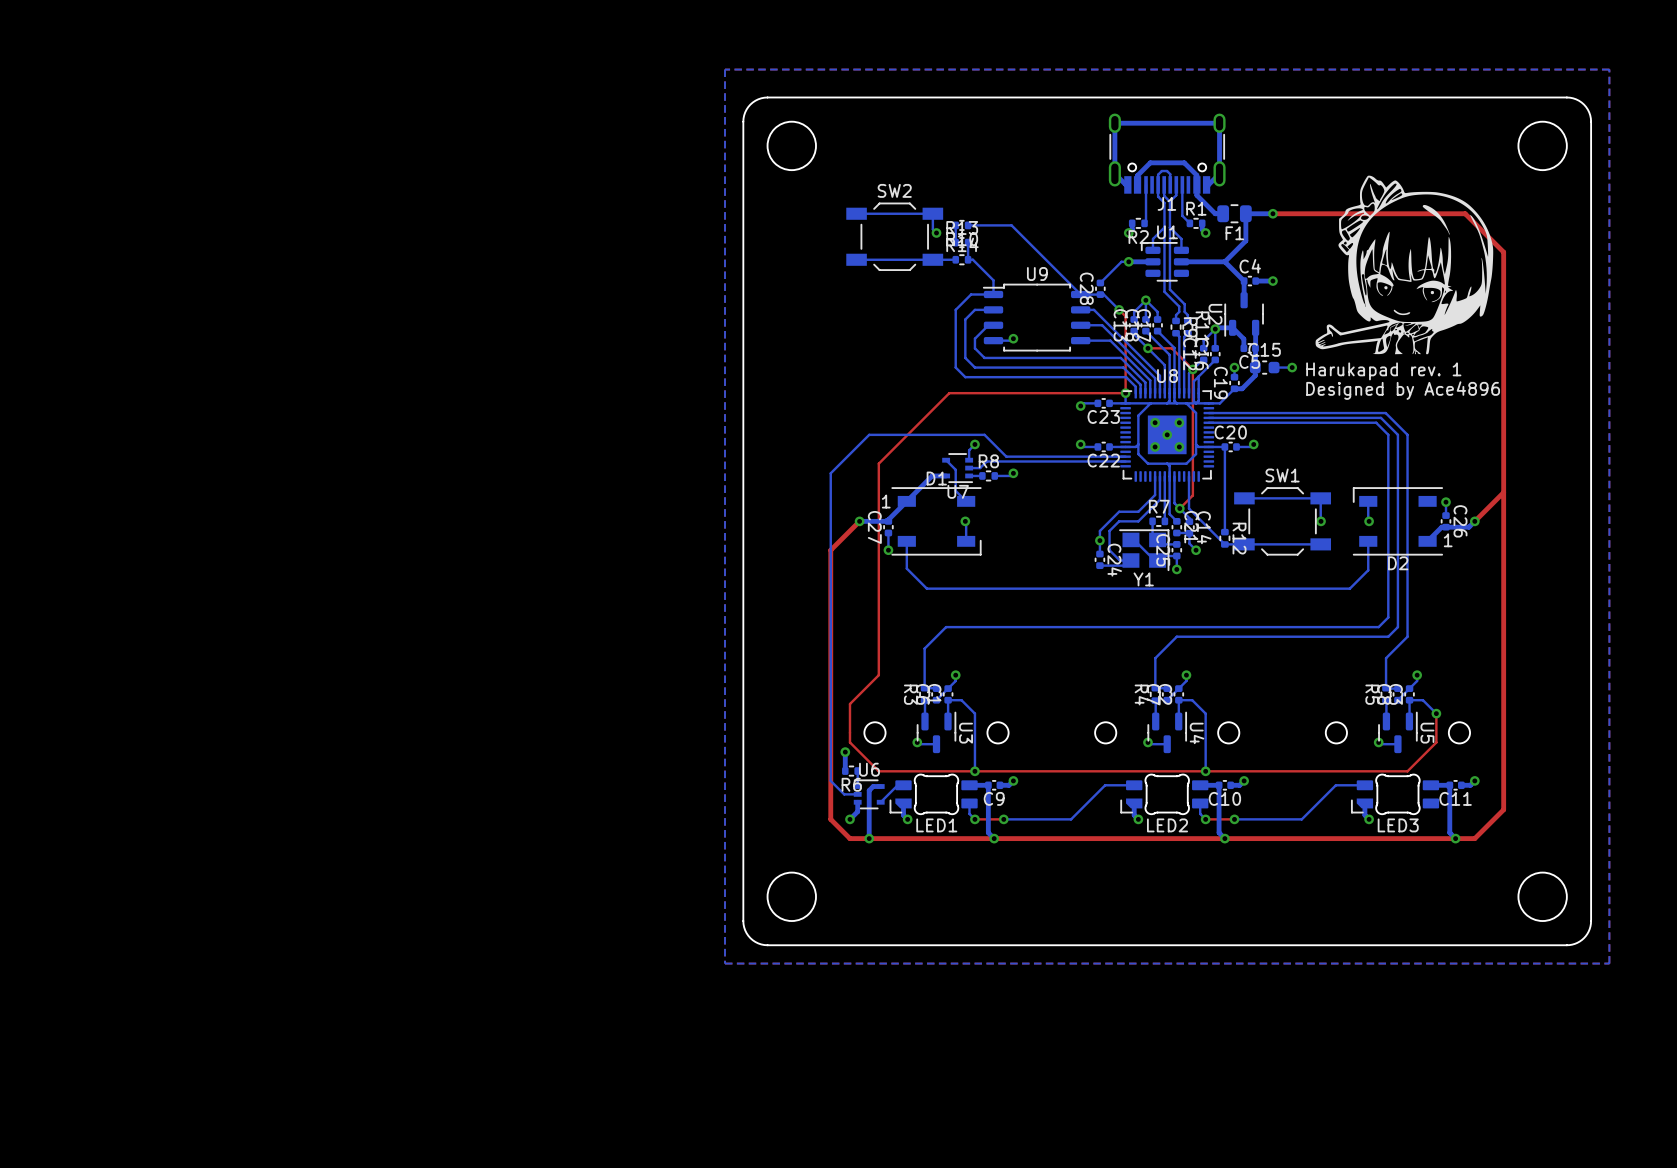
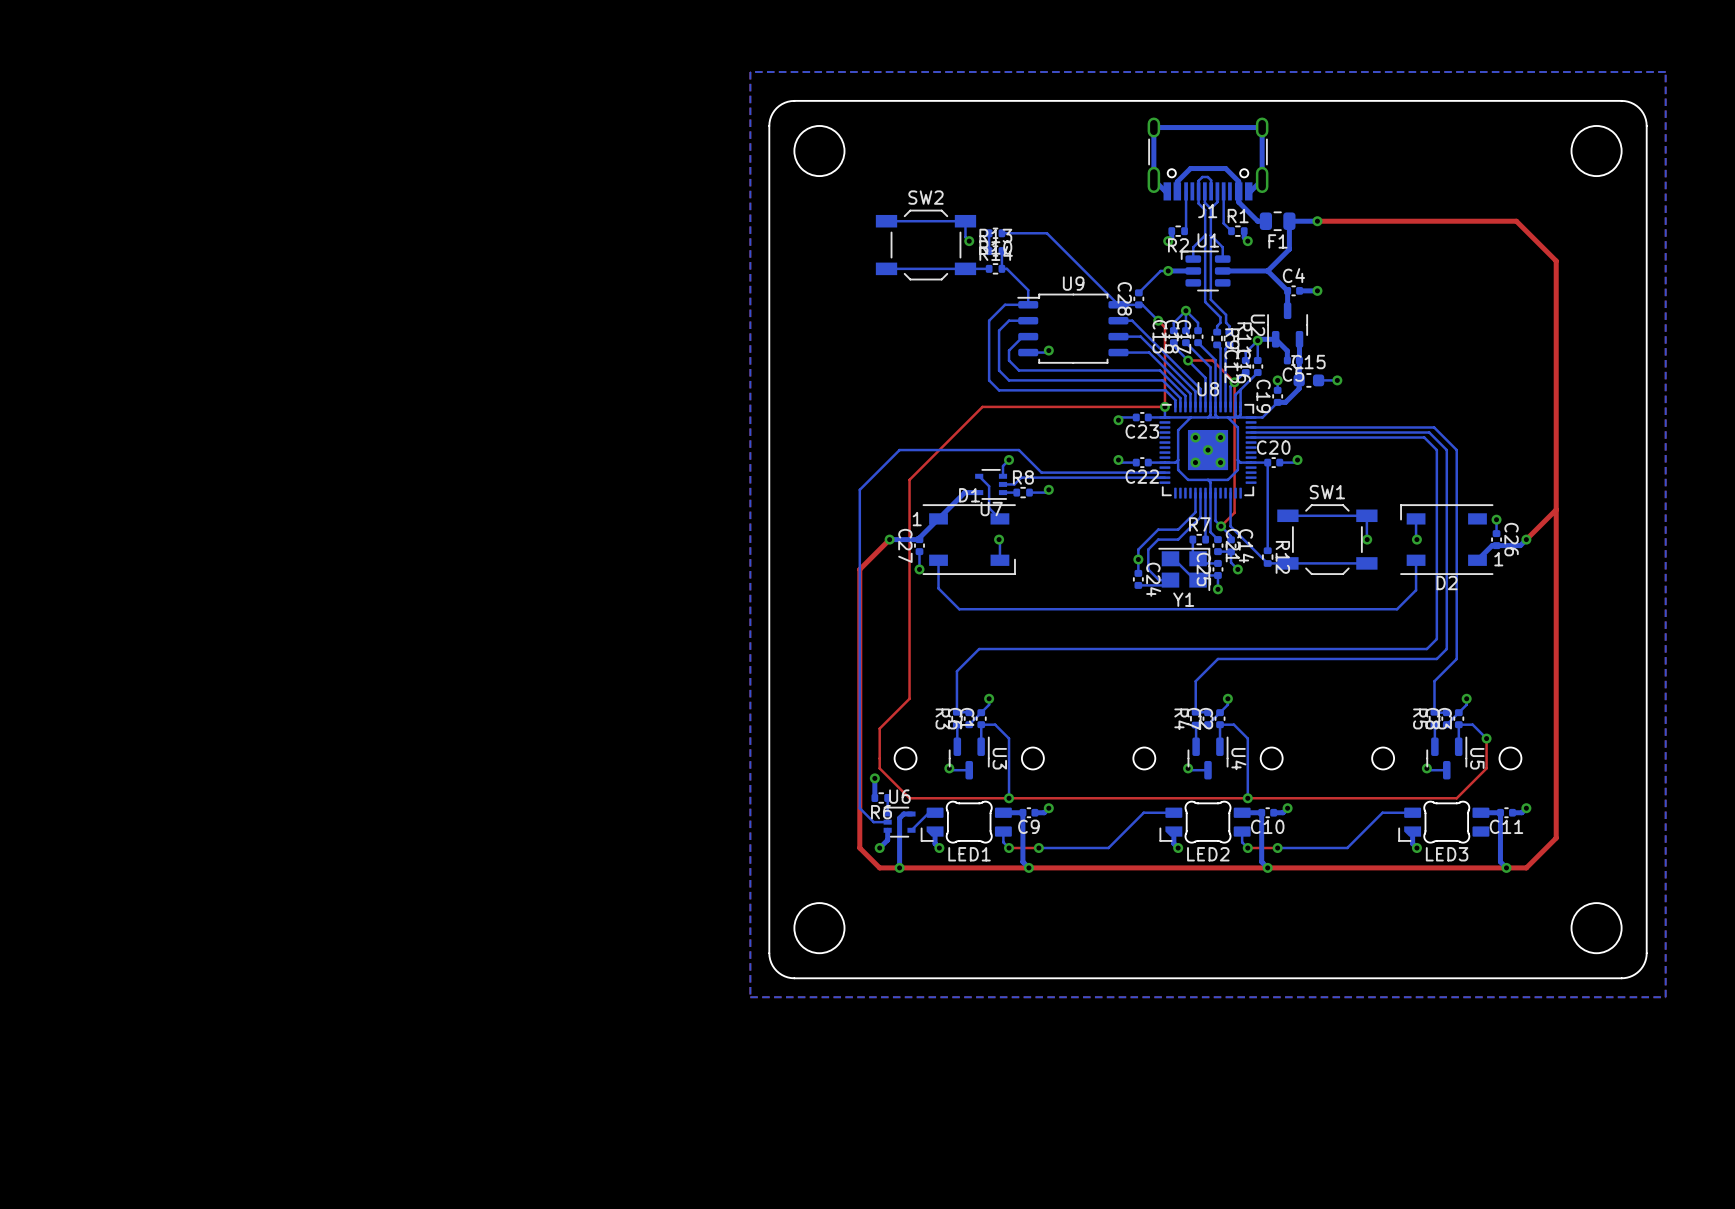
drawing: [1315, 175, 1494, 355] -> none
text: Harukapad rev. 1 (1383, 371) -> none
text: Designed by Ace4896 (1403, 390) -> none

